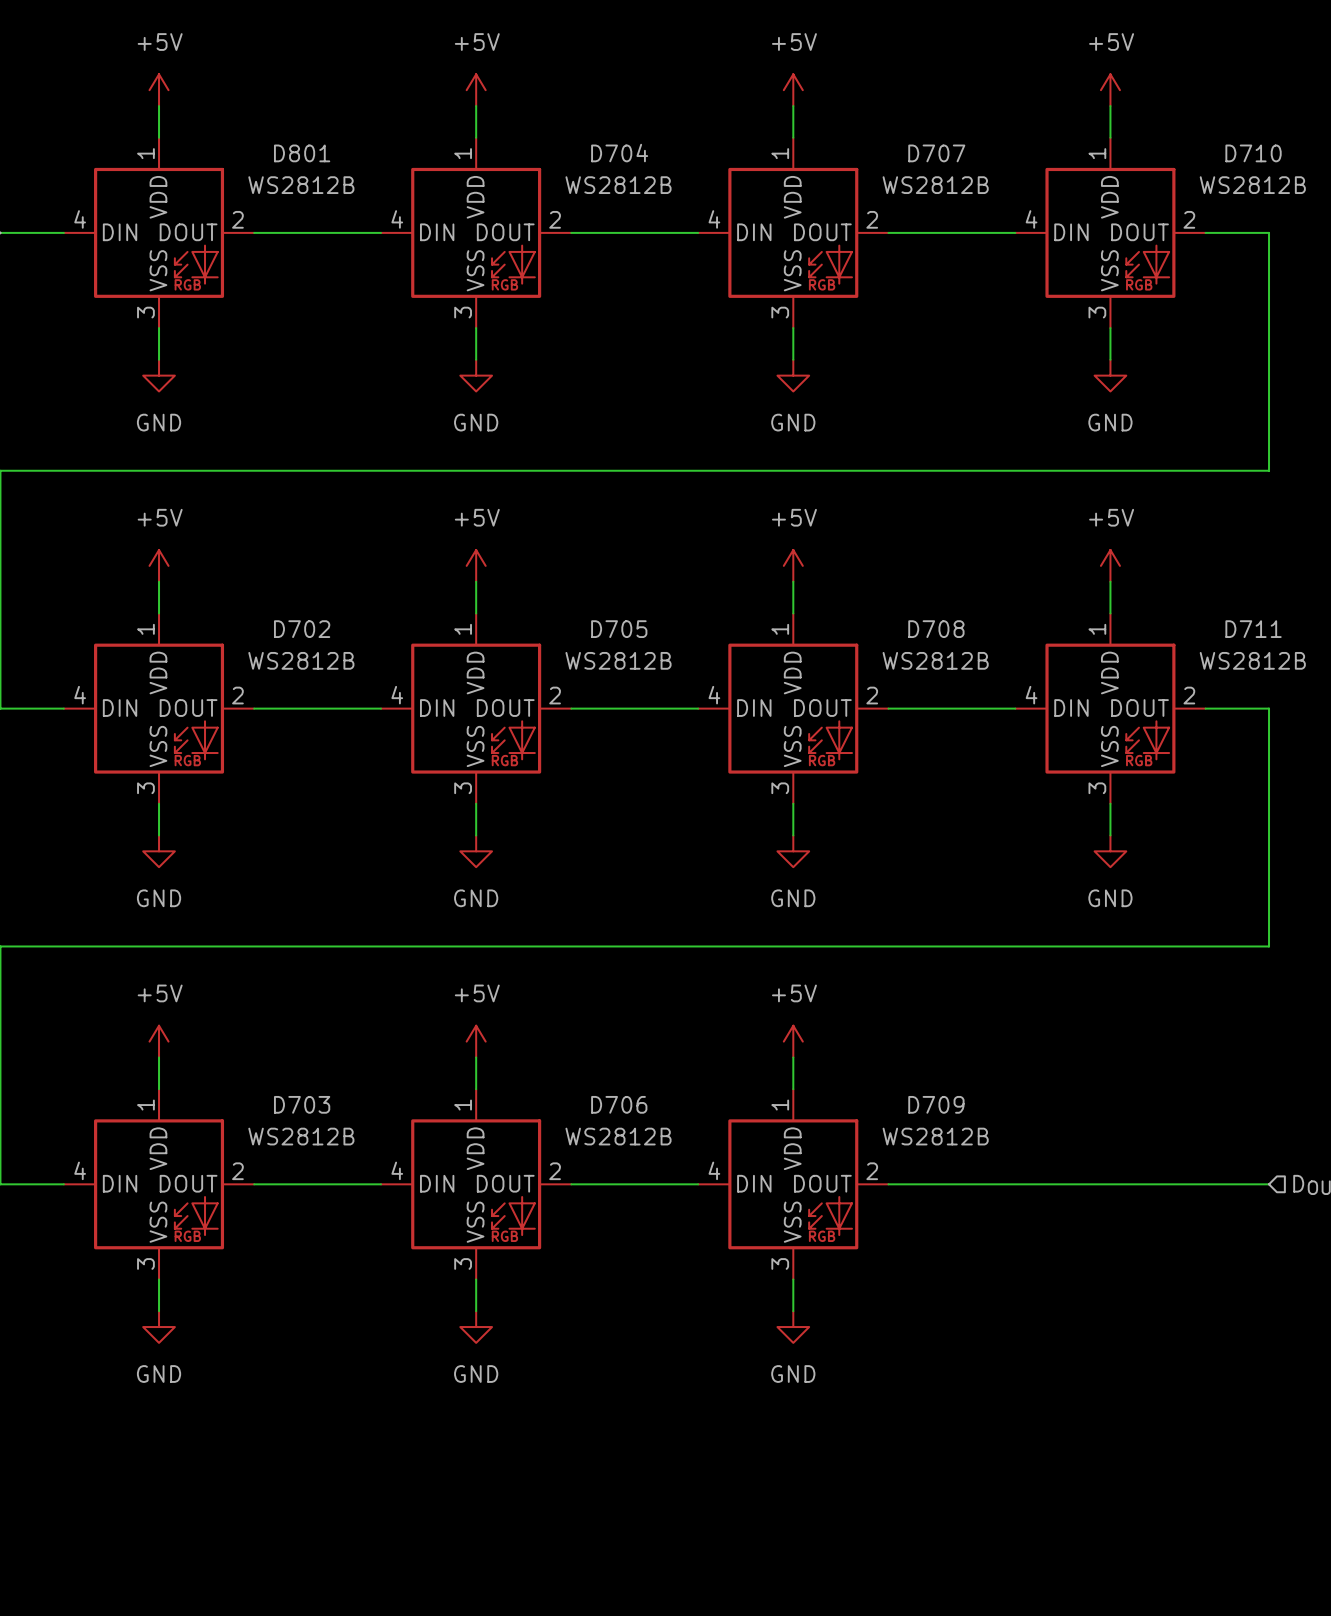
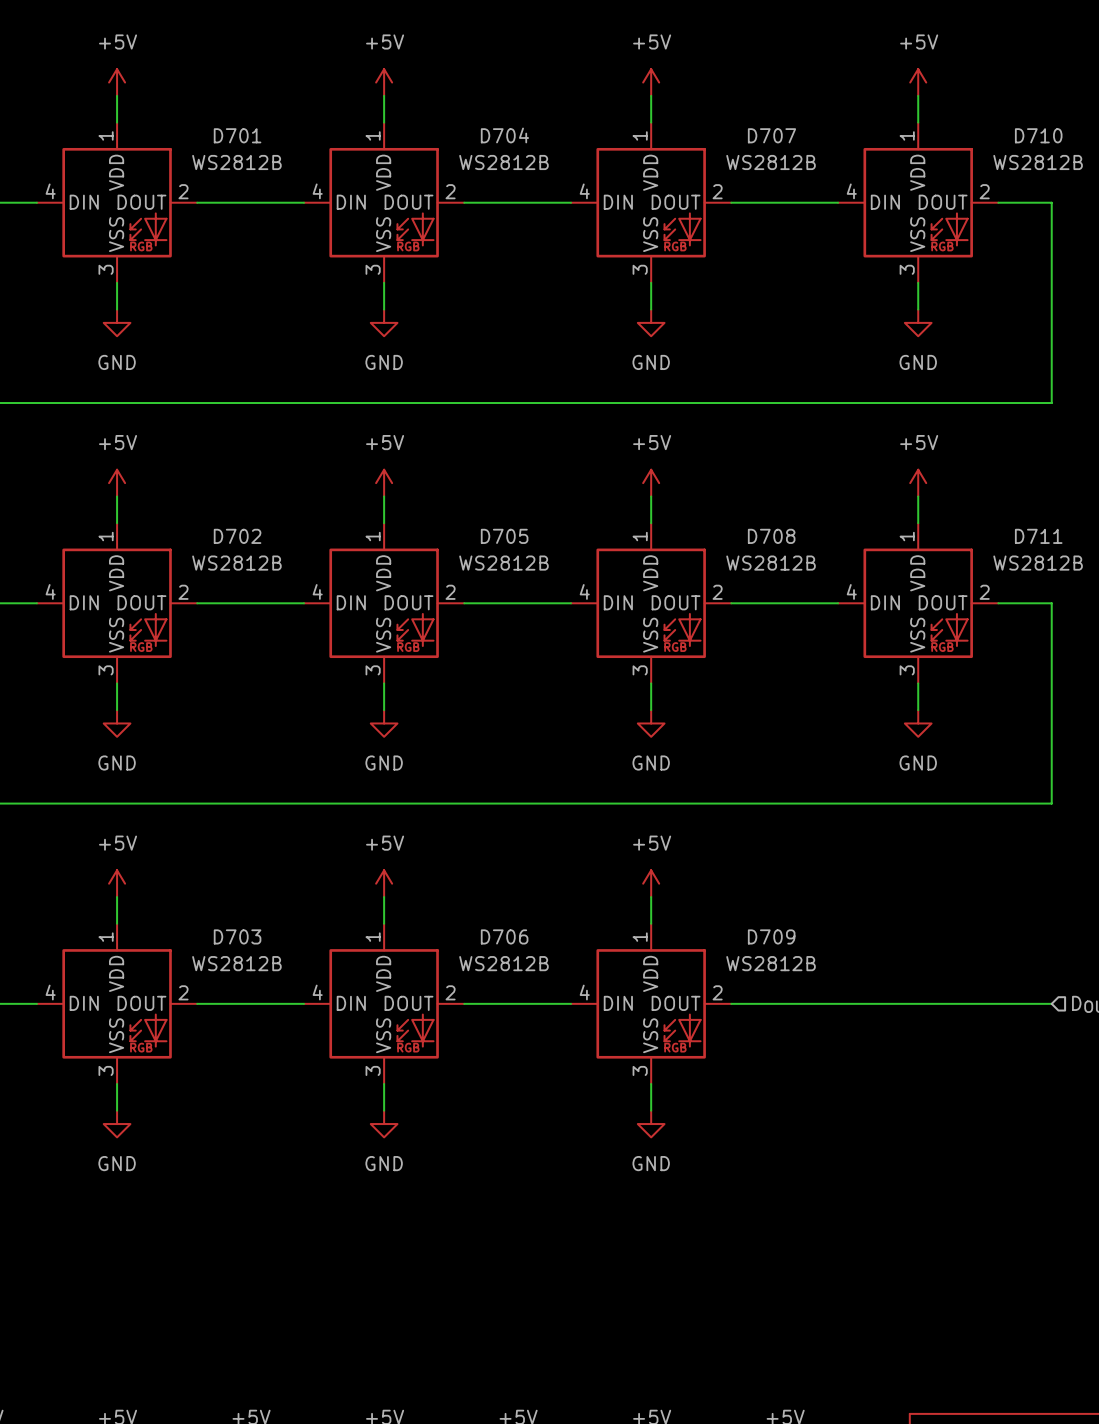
D801 name: D801 (302, 153) -> D701 (237, 135)

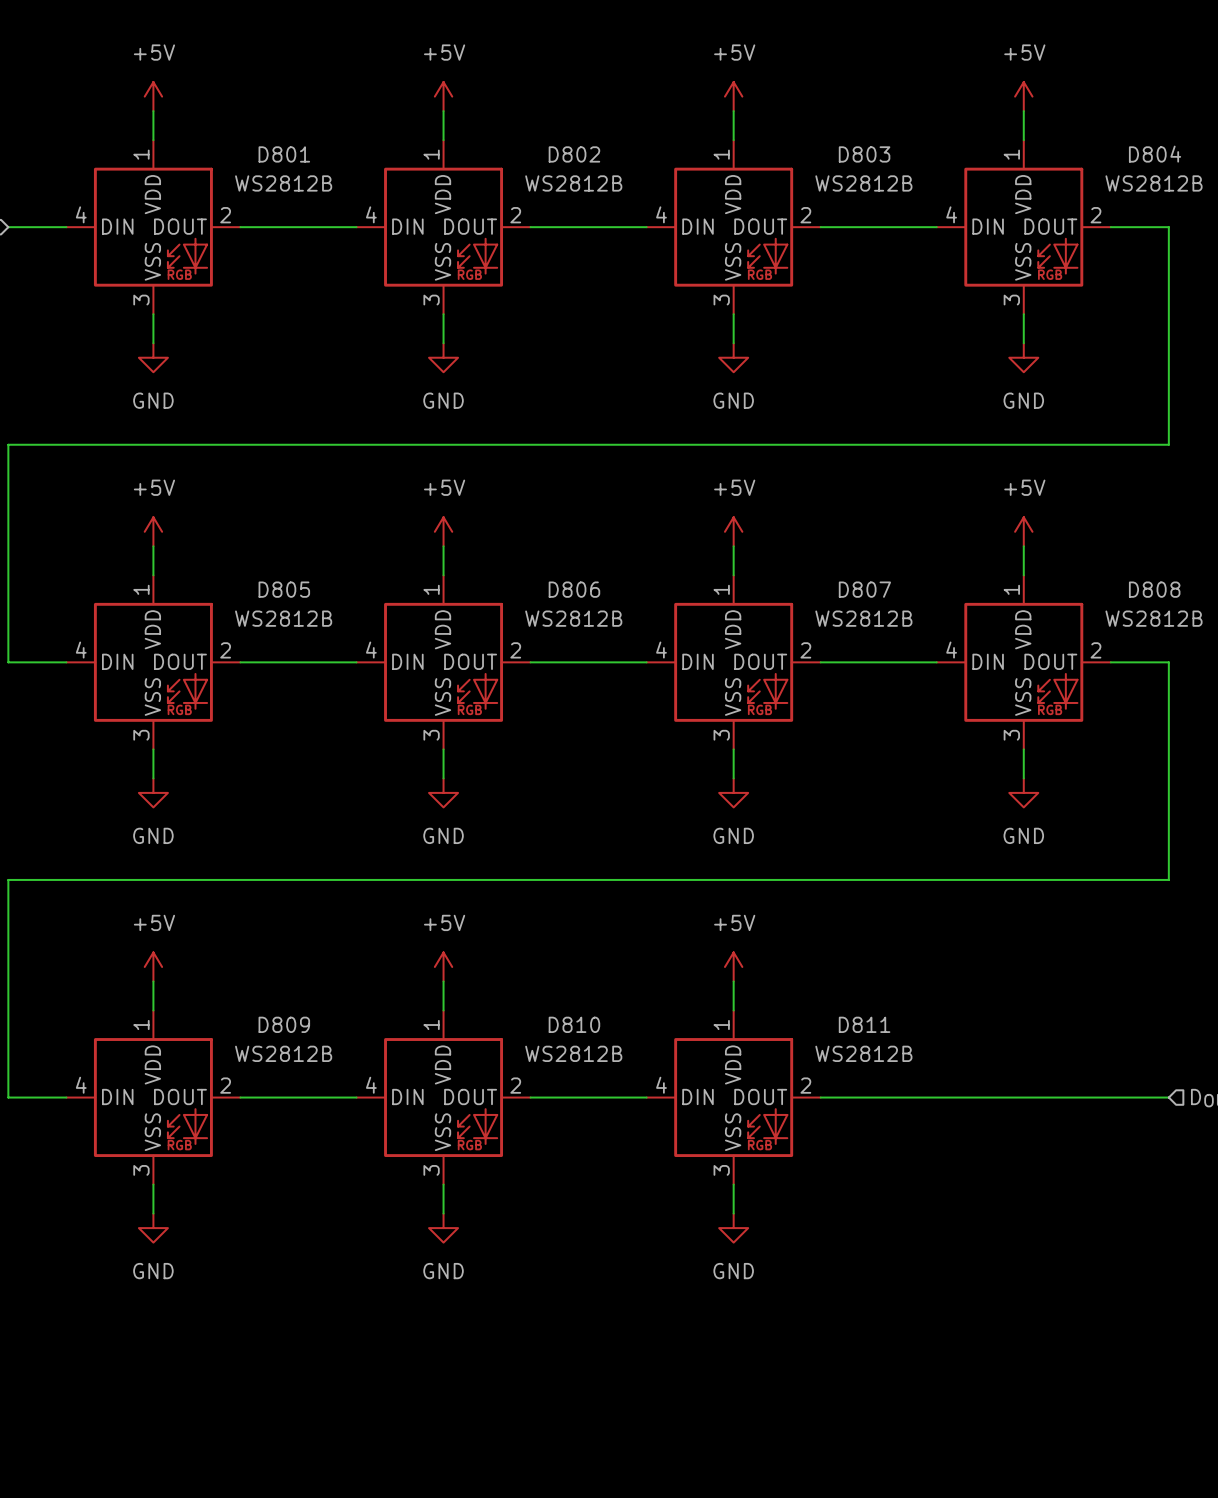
D701 name: D701 (237, 135) -> D801 (284, 154)
D704 name: D704 (504, 135) -> D802 (574, 154)
D707 name: D707 (771, 135) -> D803 (864, 154)
D710 name: D710 (1038, 135) -> D804 (1155, 154)
D702 name: D702 (237, 536) -> D805 (284, 589)
D705 name: D705 (504, 536) -> D806 (574, 589)
D708 name: D708 (771, 536) -> D807 (864, 589)
D711 name: D711 (1038, 536) -> D808 (1154, 589)
D703 name: D703 (237, 936) -> D809 (284, 1024)
D706 name: D706 (504, 936) -> D810 (574, 1024)
D709 name: D709 (771, 936) -> D811 (864, 1024)

